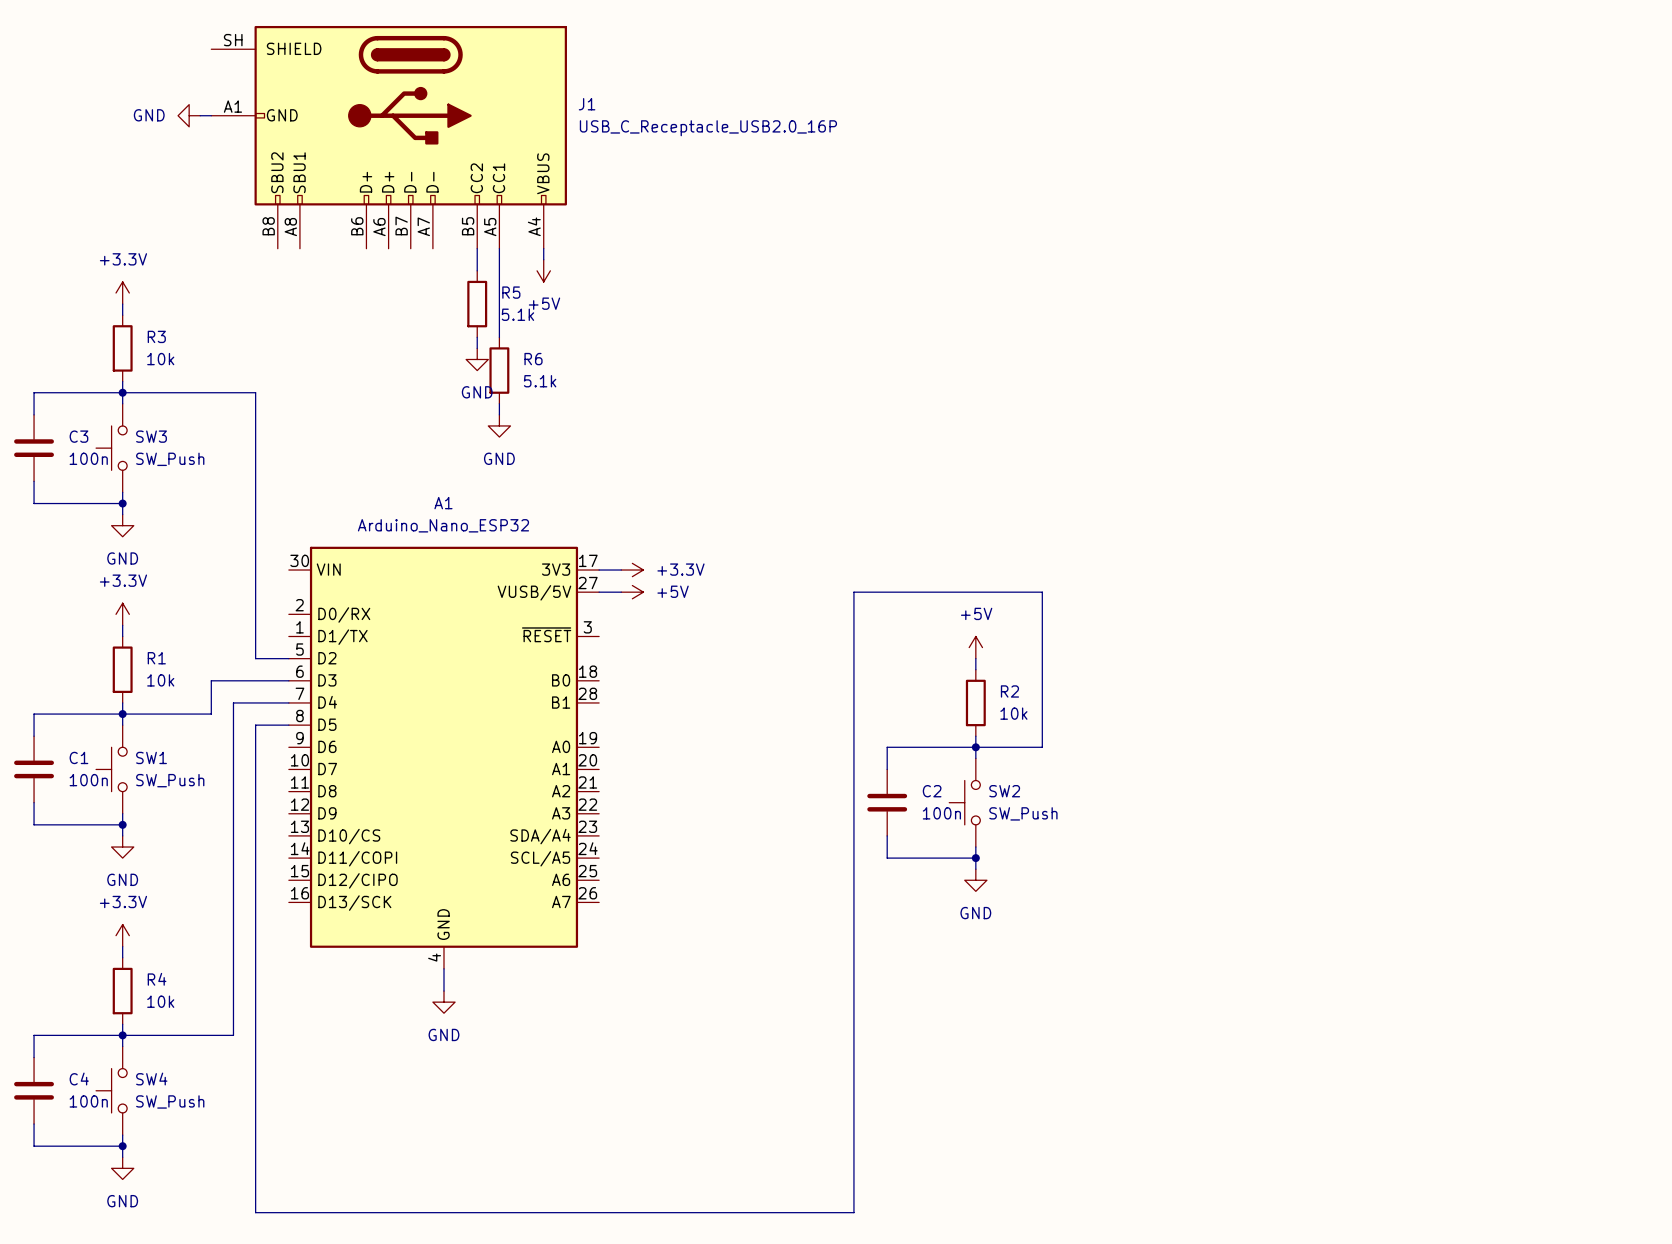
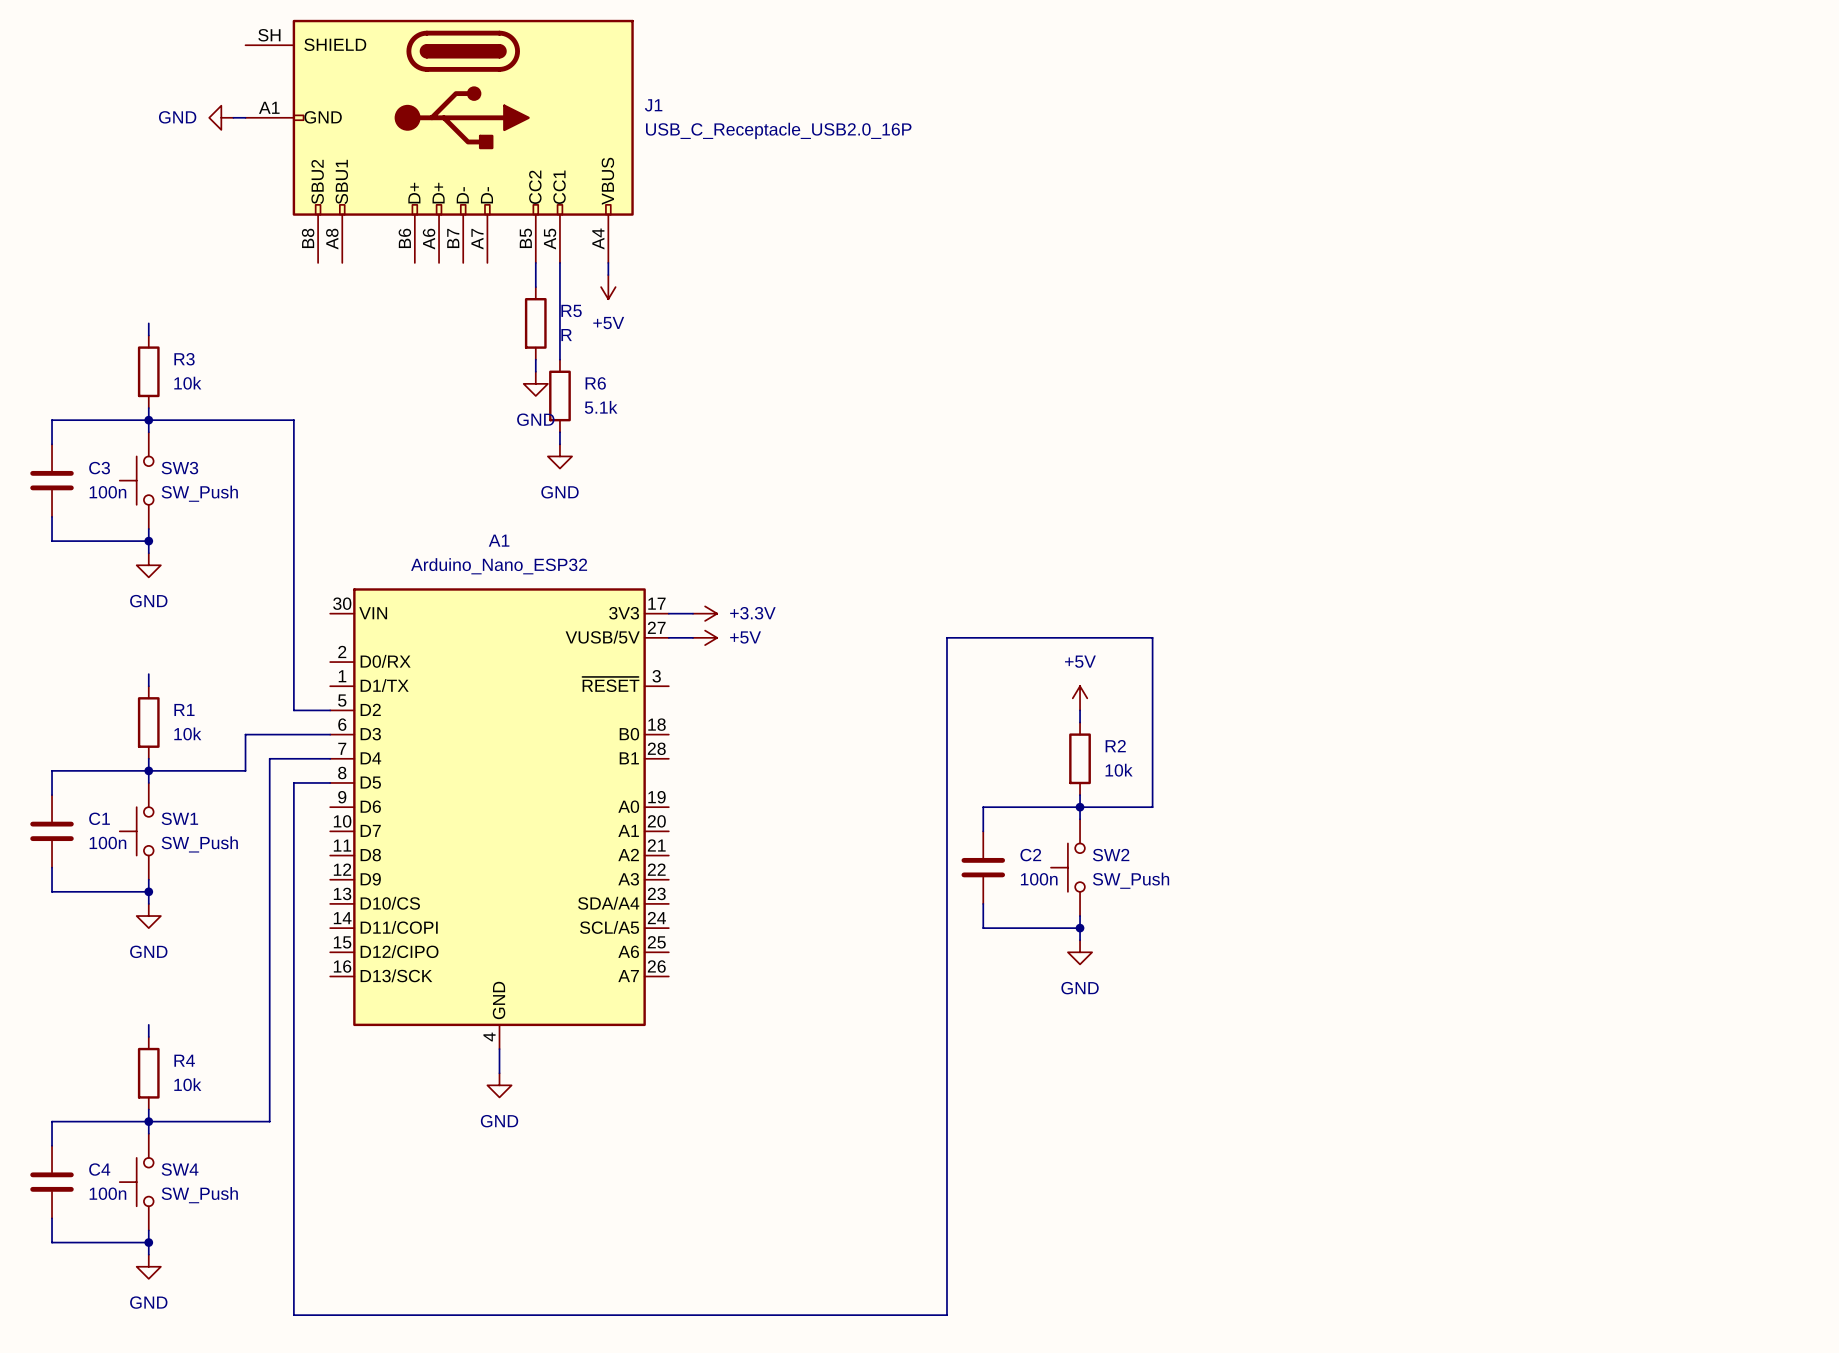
power symbol: +3.3V (122, 293) -> none
R5 value: 5.1k (517, 314) -> R (566, 335)
power symbol: +3.3V (122, 614) -> none
power symbol: +3.3V (122, 935) -> none

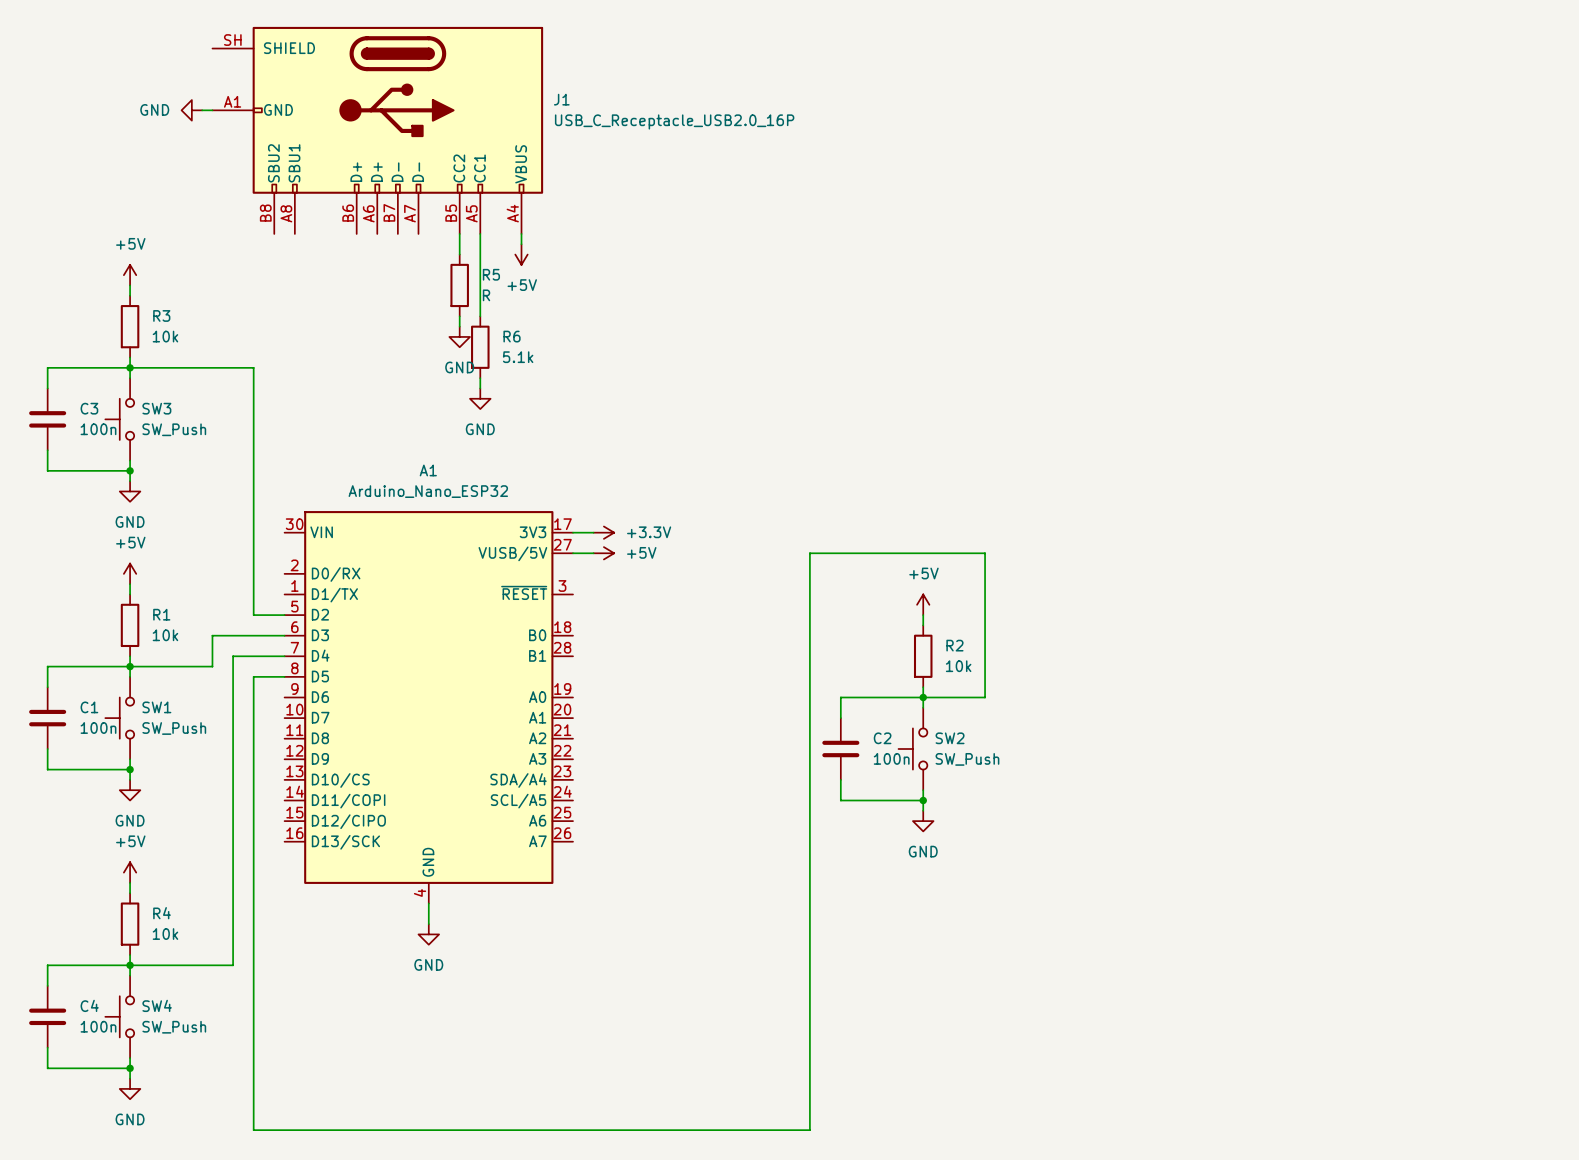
power symbol: none -> +5V (130, 275)
power symbol: none -> +5V (130, 573)
power symbol: none -> +5V (130, 872)

